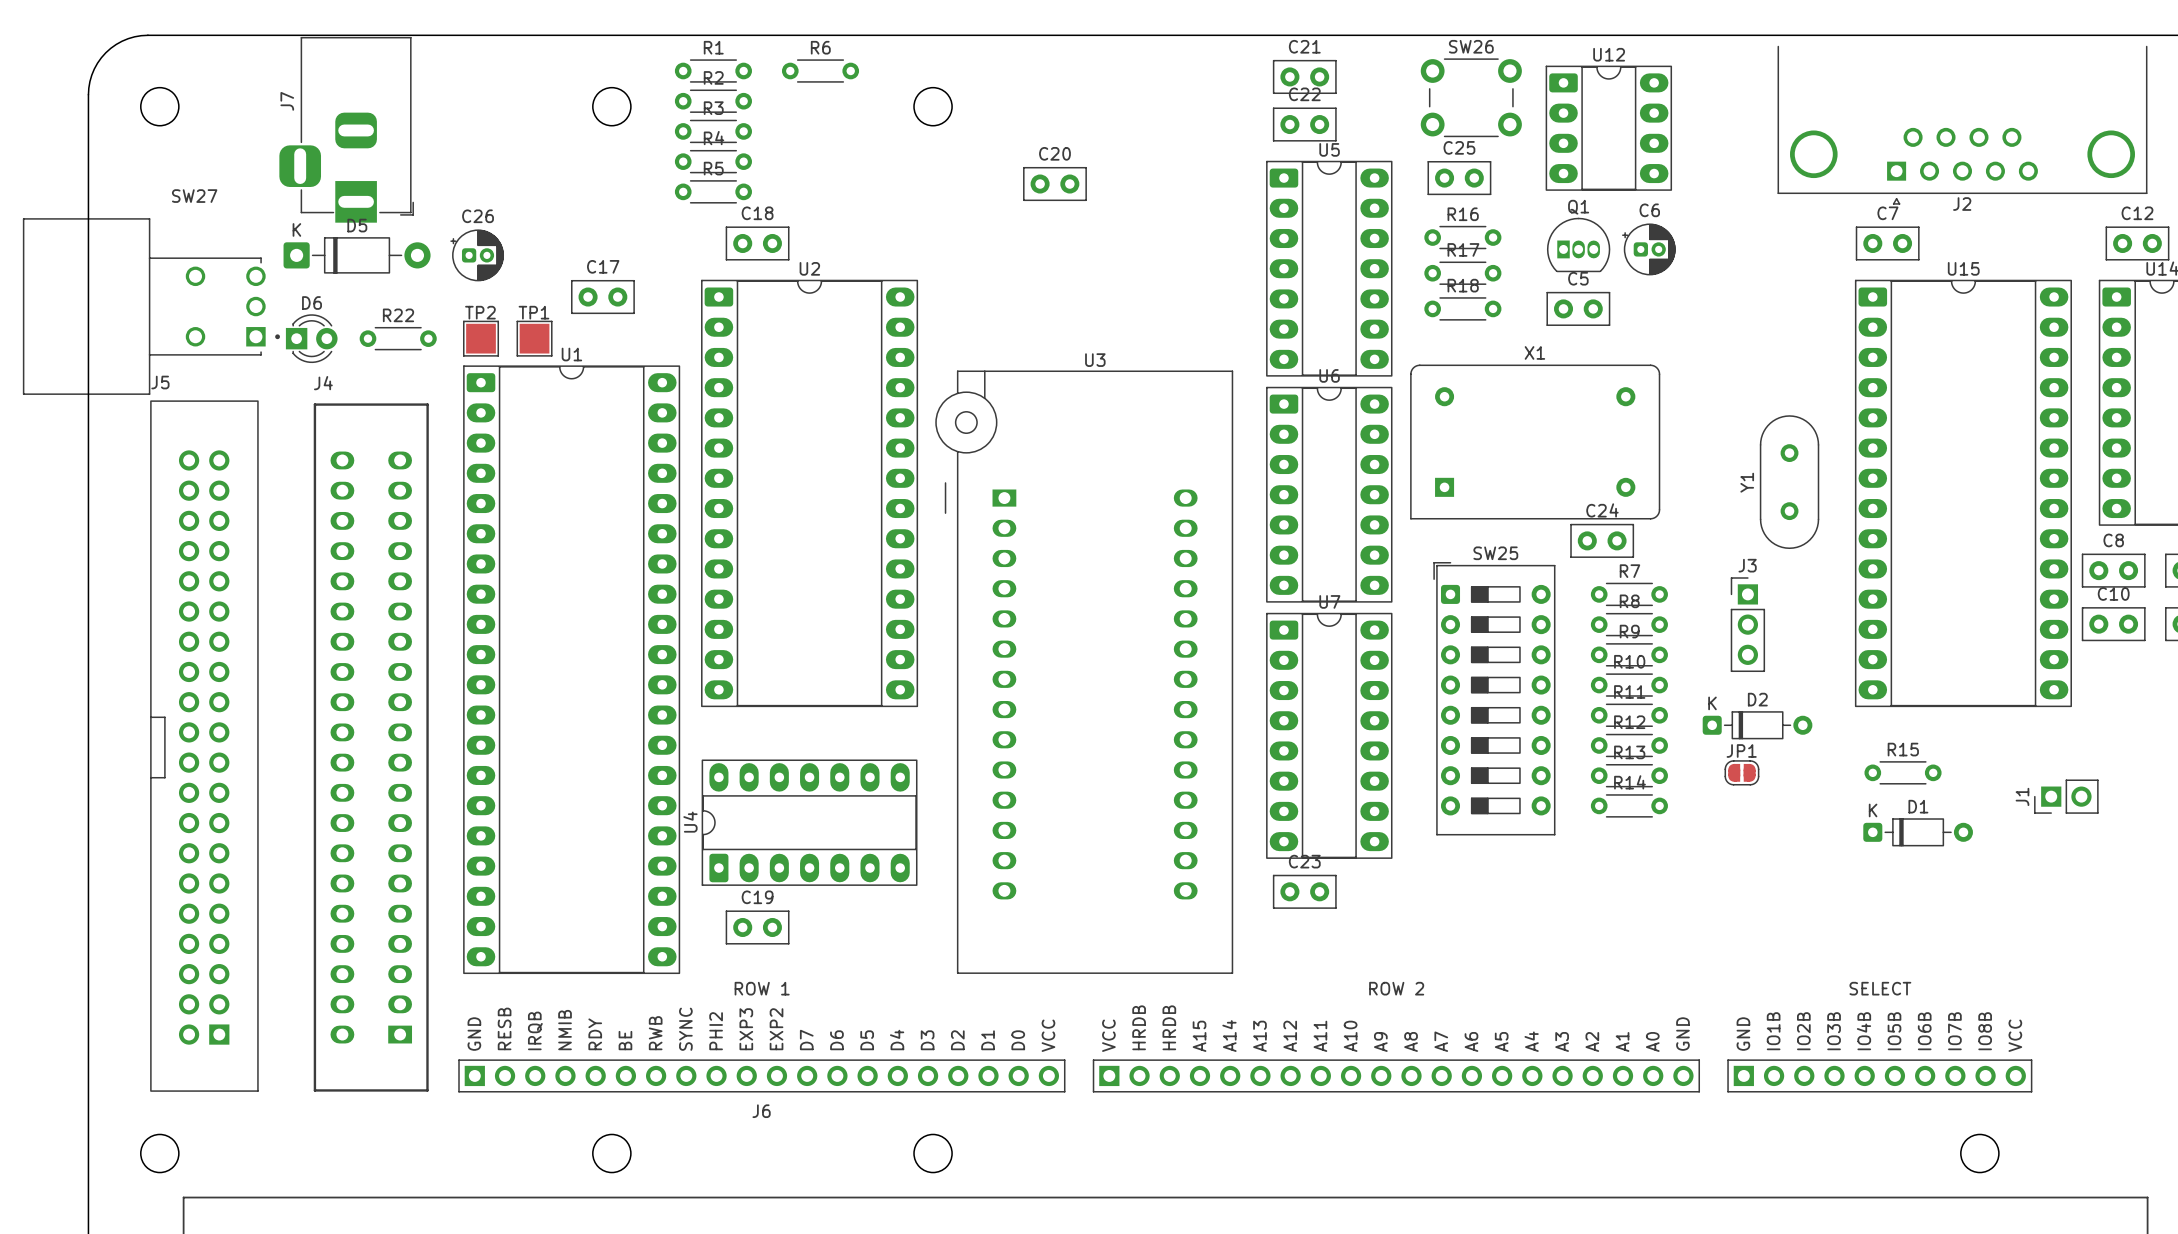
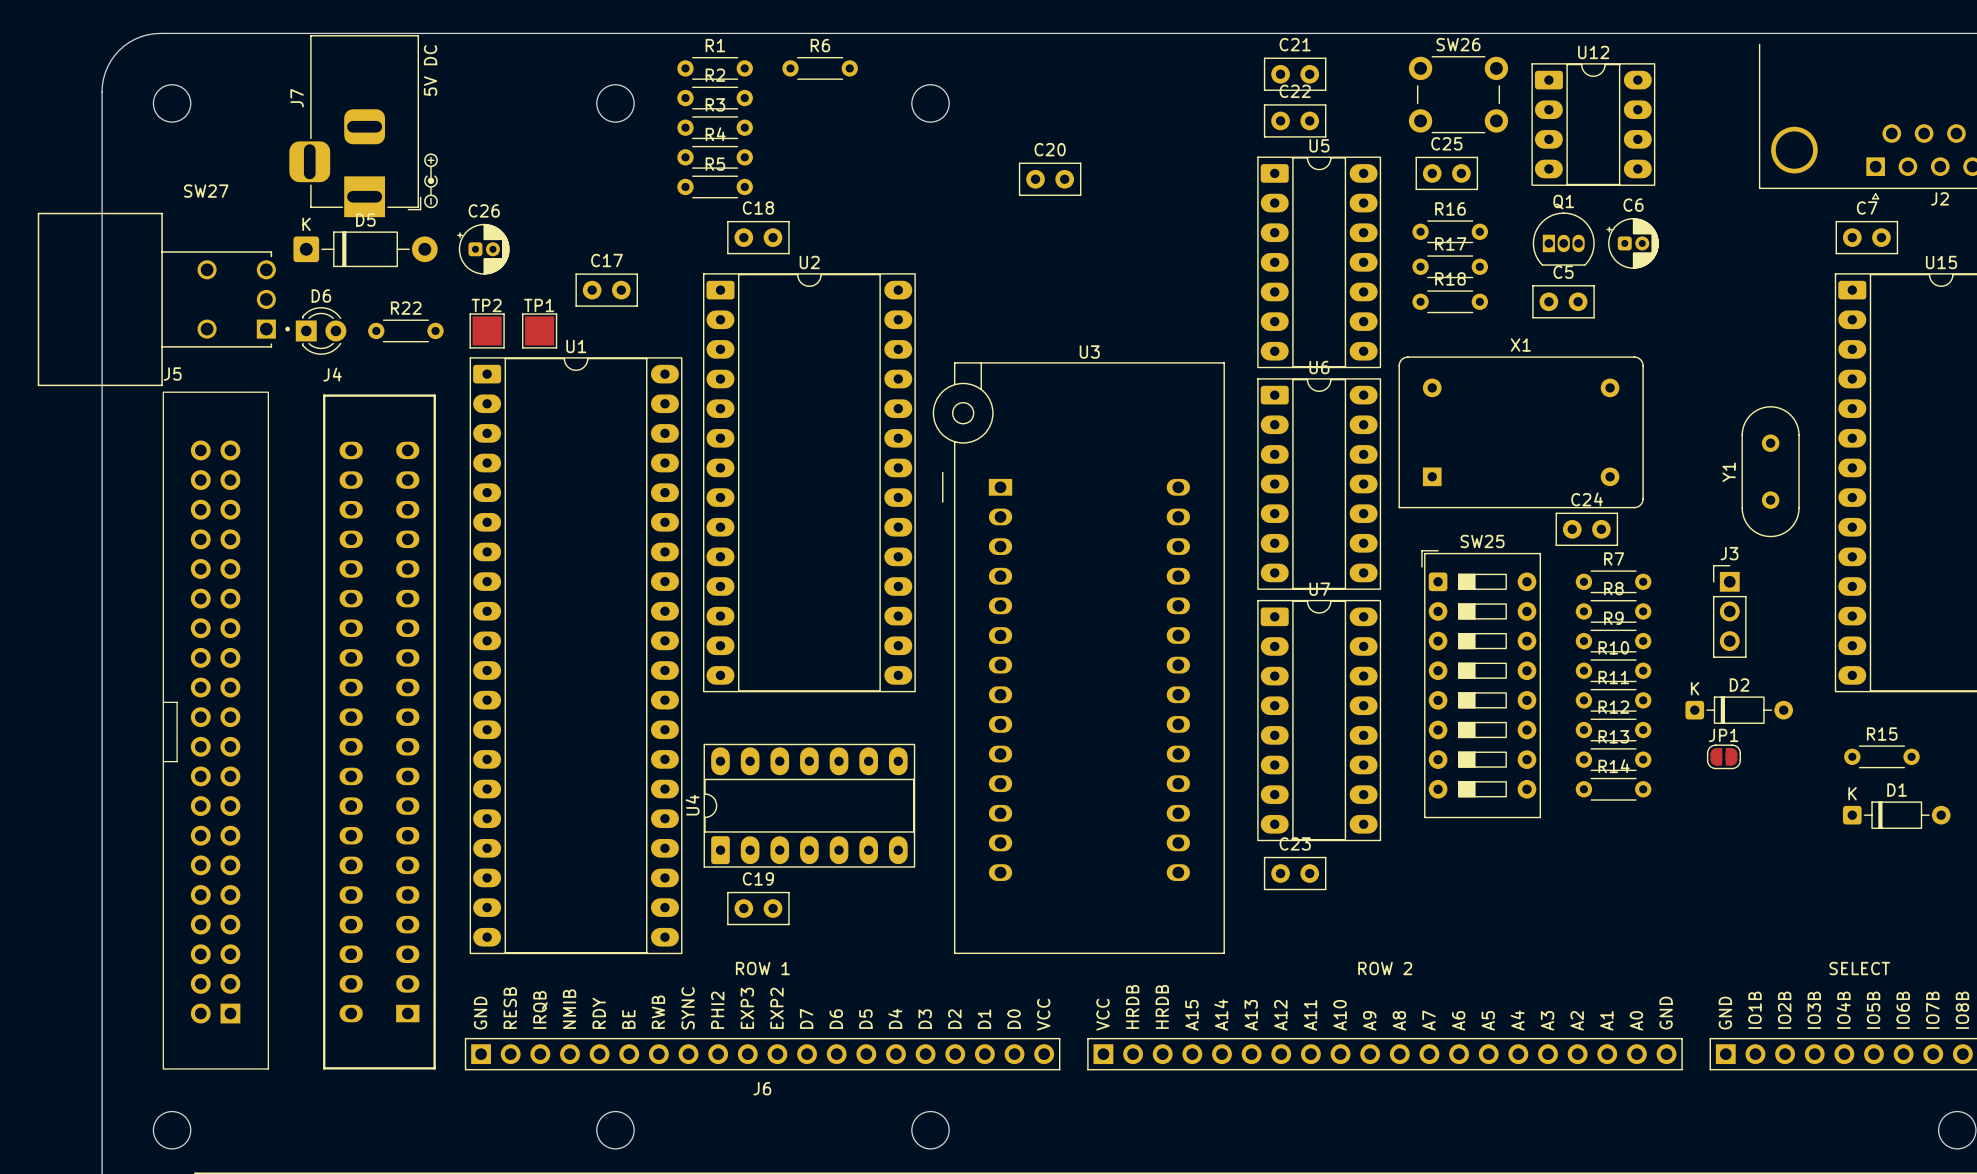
J7 value: none -> 5V DC (430, 70)
drawing: none -> [424, 153, 438, 209]

